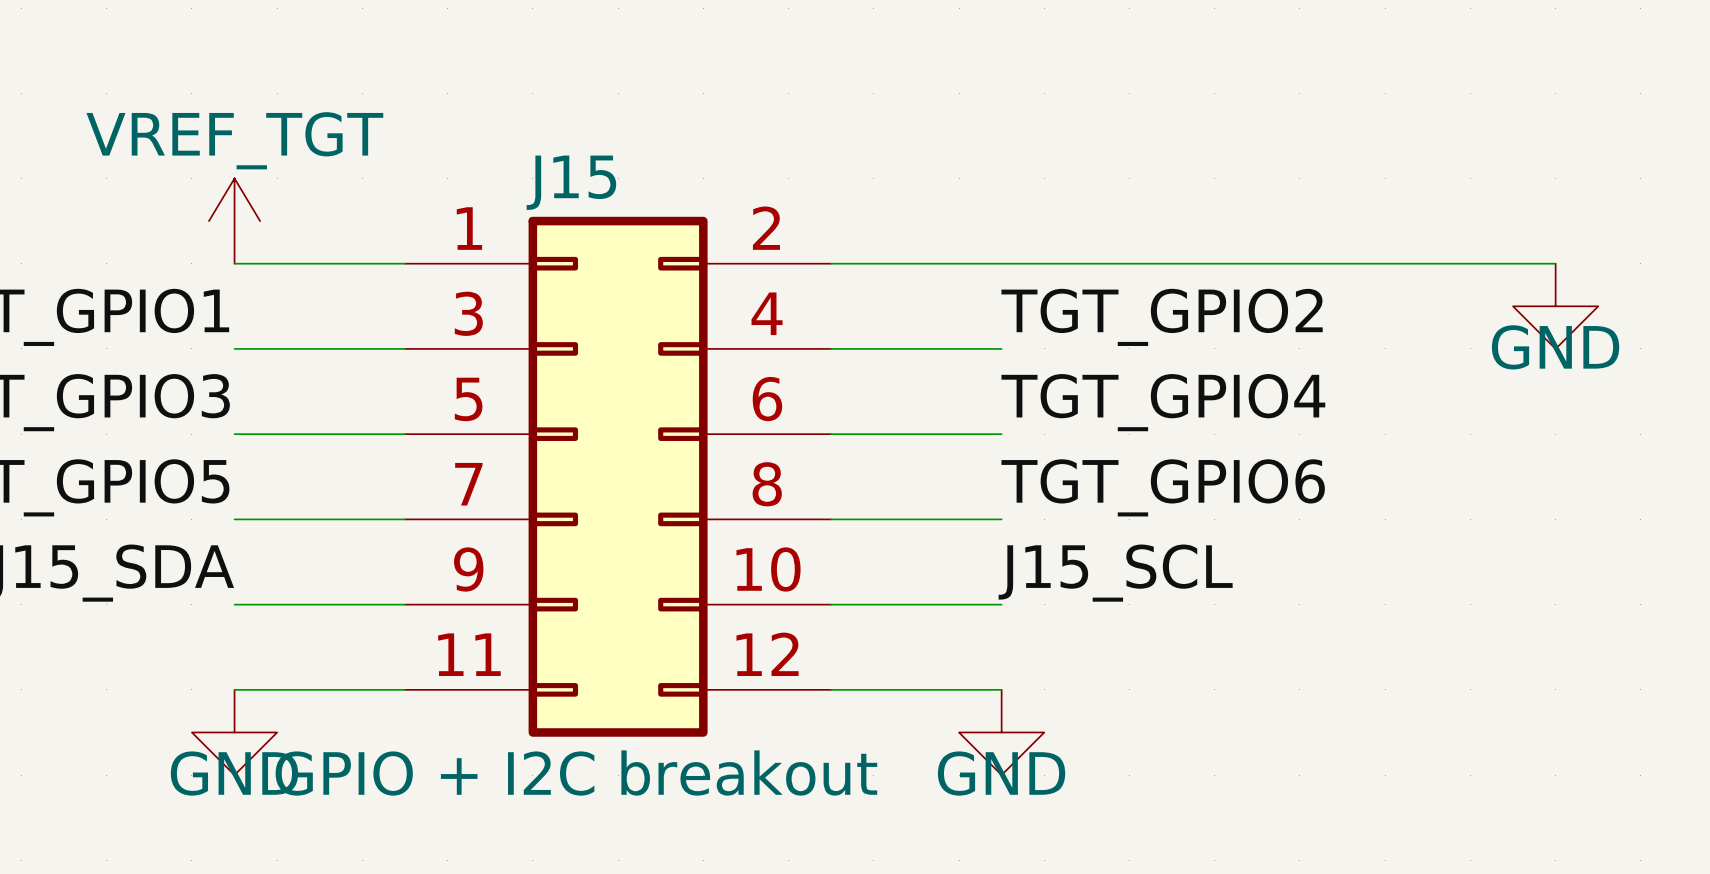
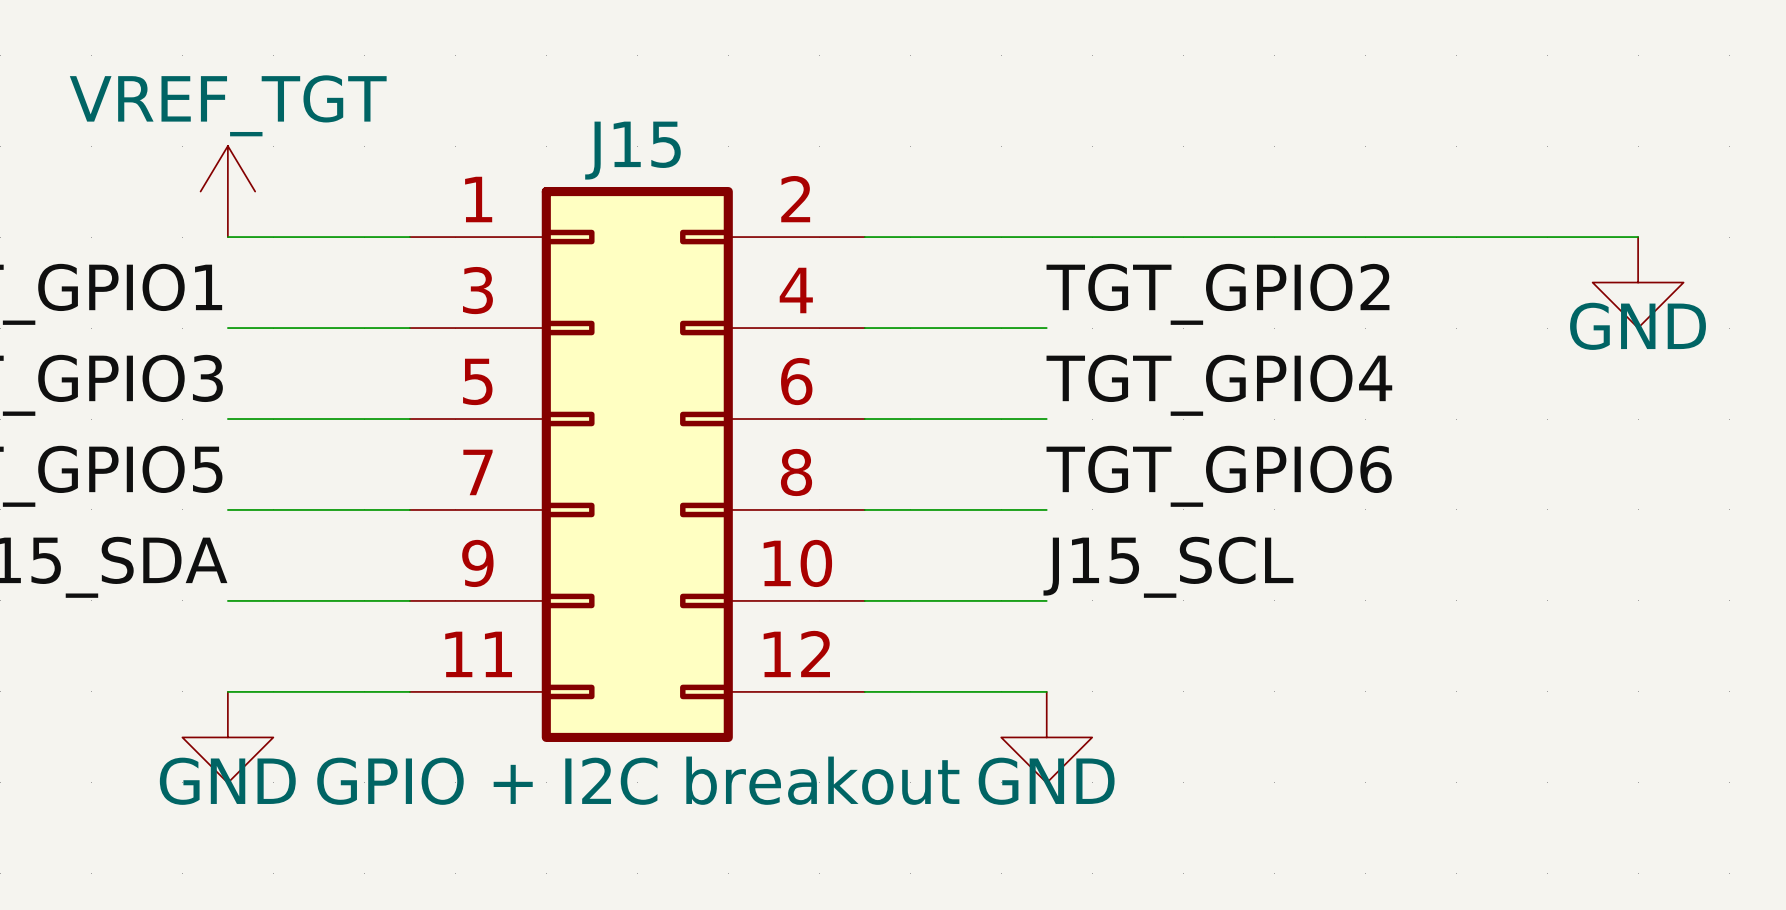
J15 name position: J15 (571, 182) -> J15 (632, 150)
J15 value position: GPIO + I2C breakout (576, 773) -> GPIO + I2C breakout (638, 780)

